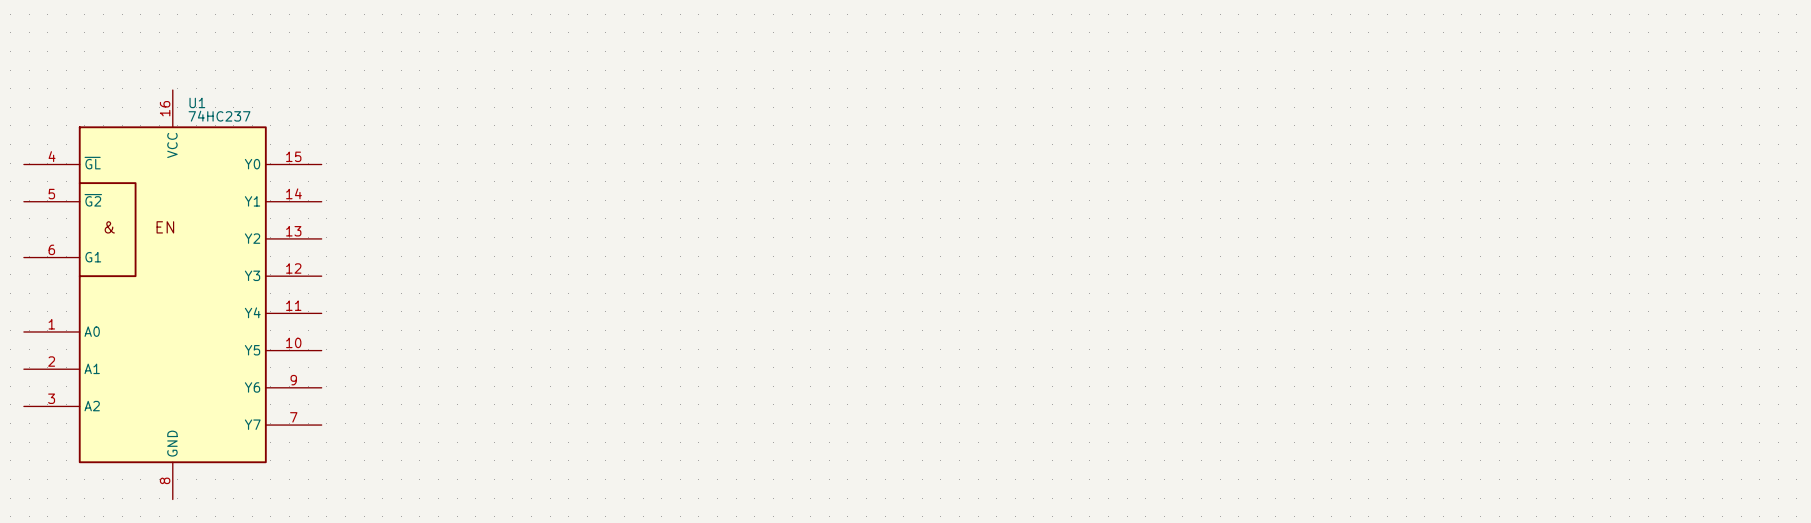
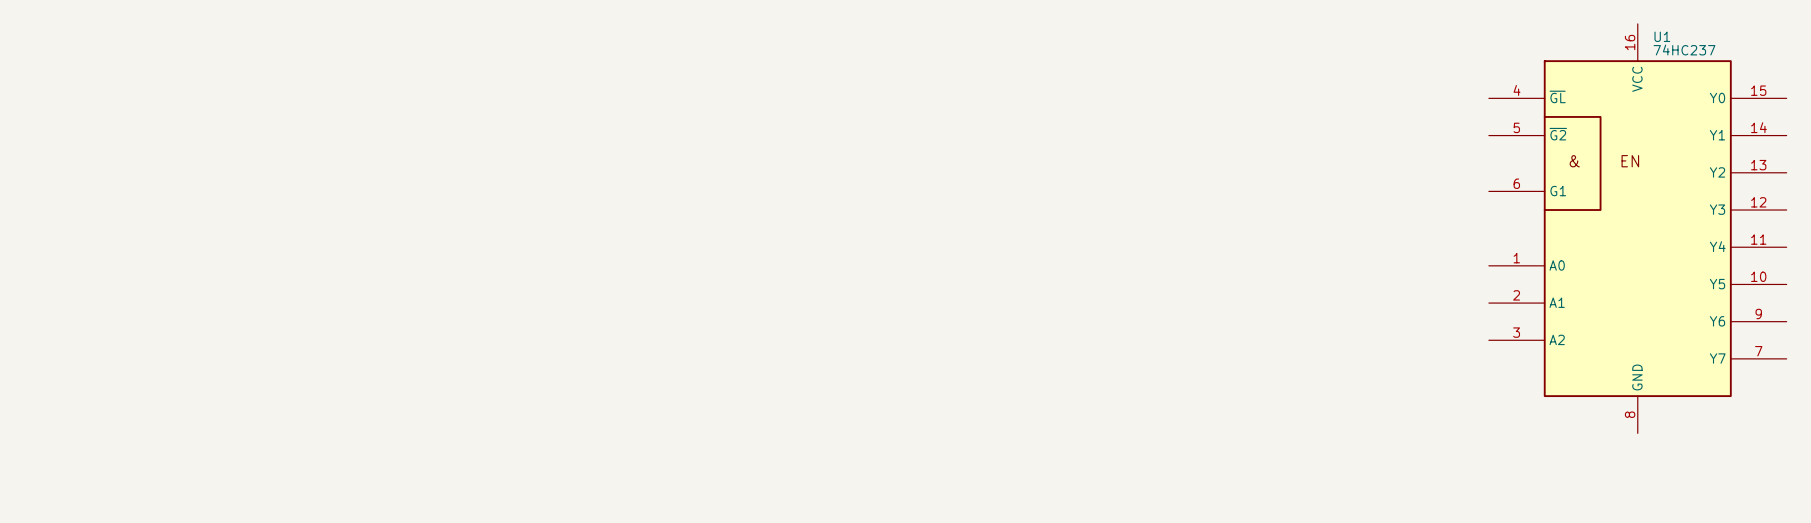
U1 symbol: [23, 90, 322, 500] -> [1488, 23, 1787, 434]

